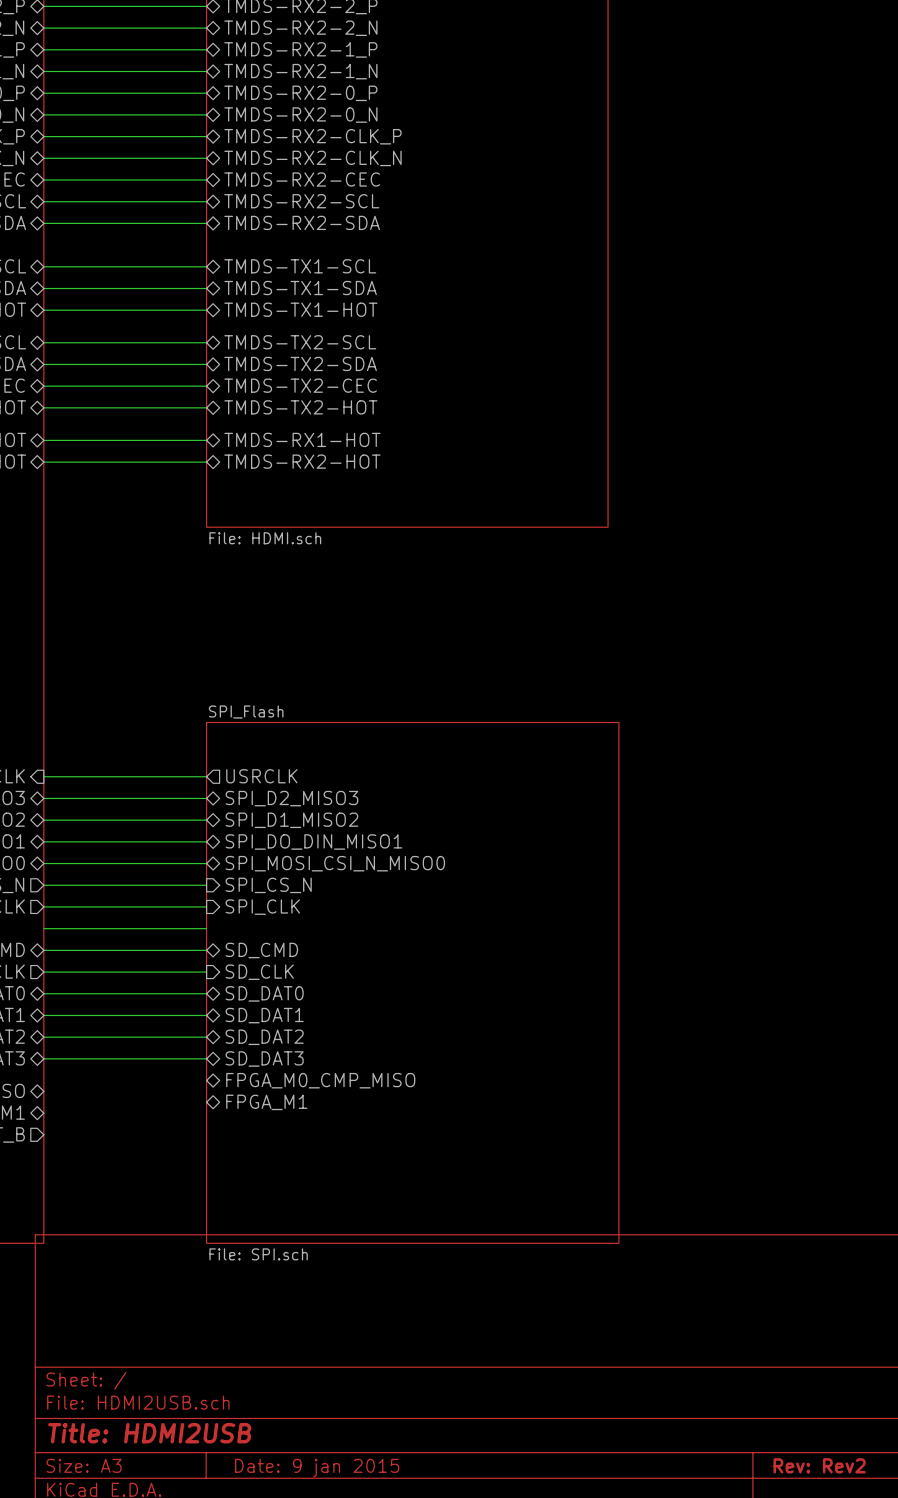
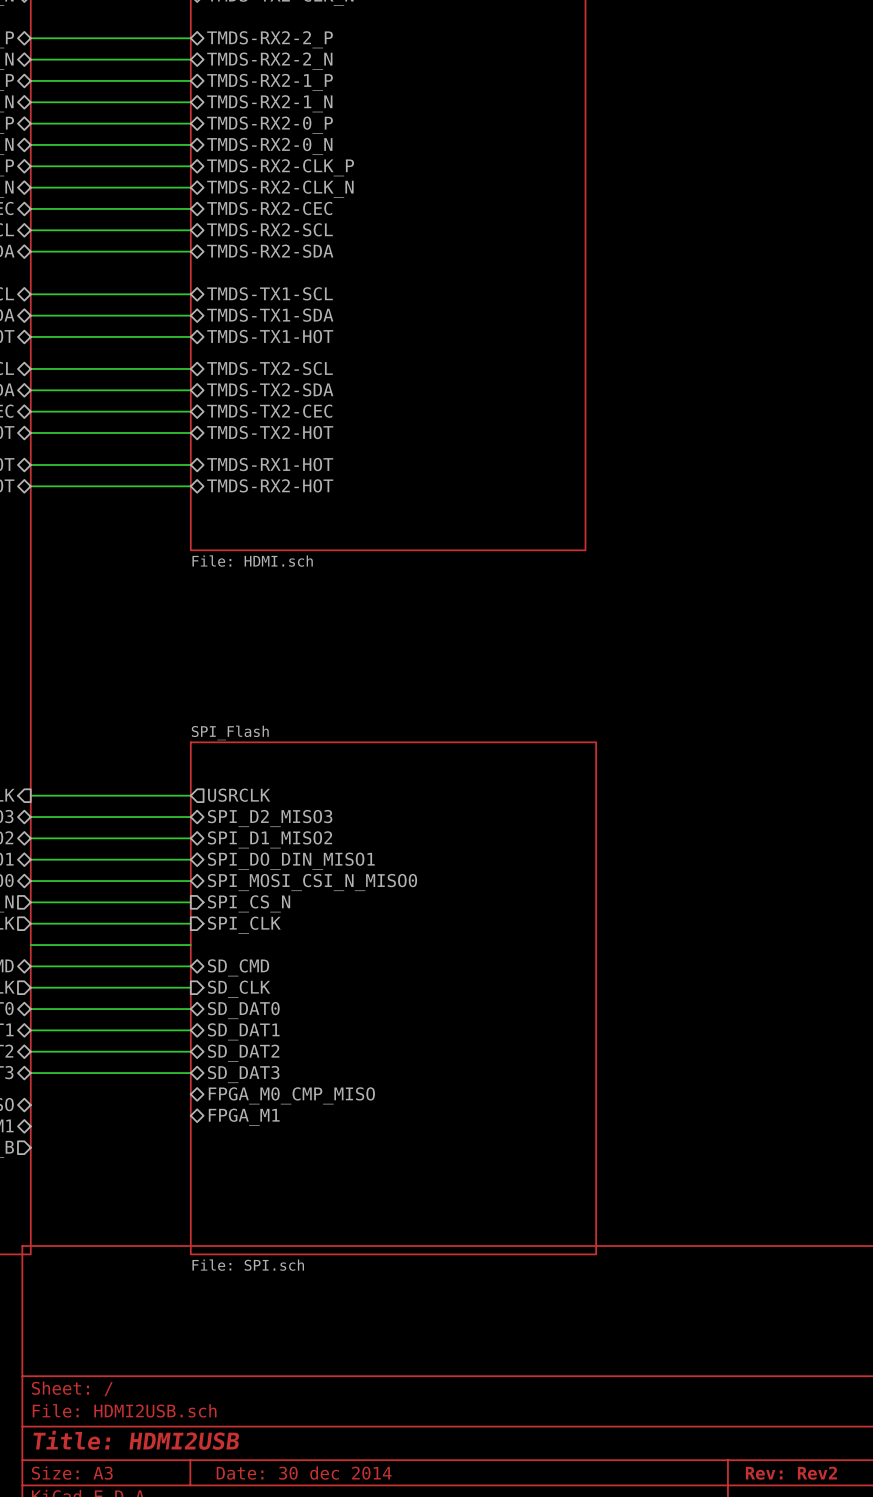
title block: Date: 9 jan 2015 (317, 1467) -> Date: 30 dec 2014 (304, 1473)

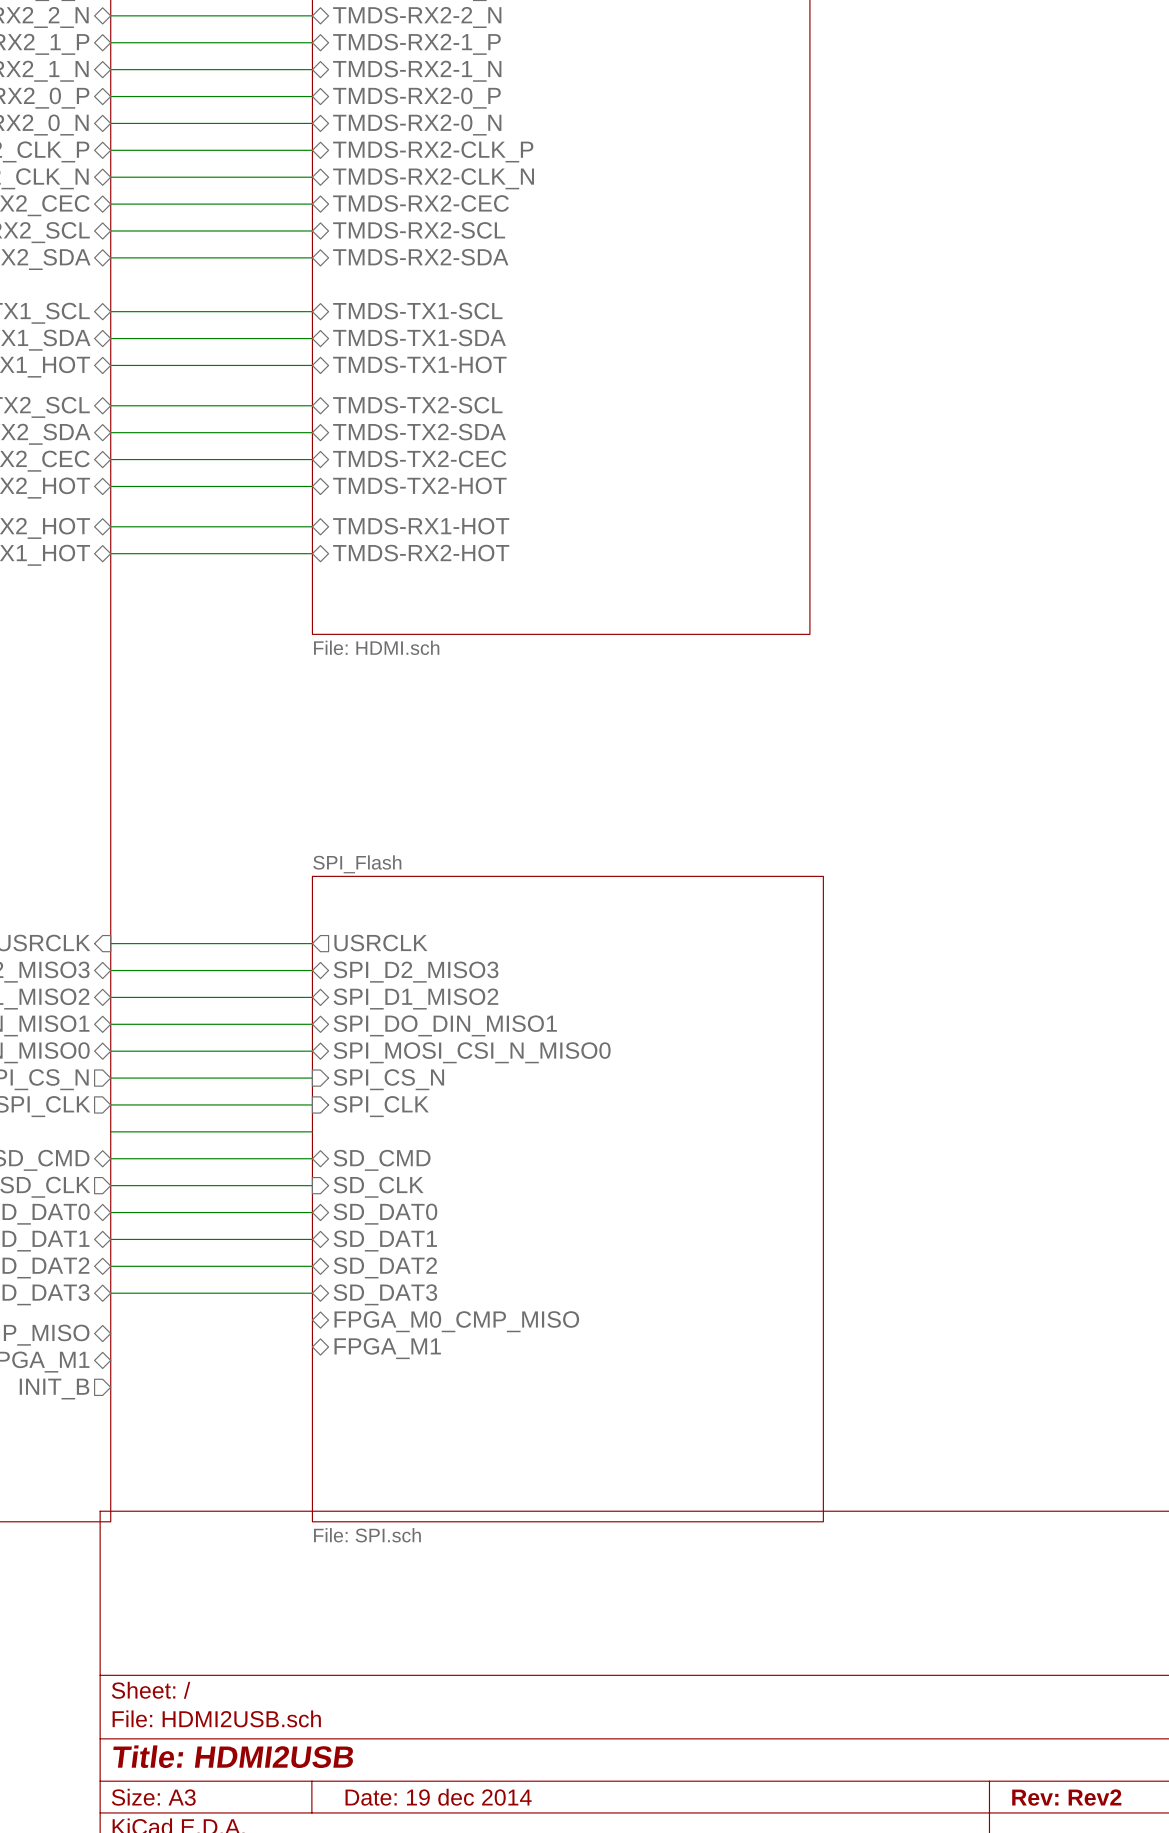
title block: Date: 30 dec 2014 (304, 1473) -> Date: 19 dec 2014 (438, 1797)

